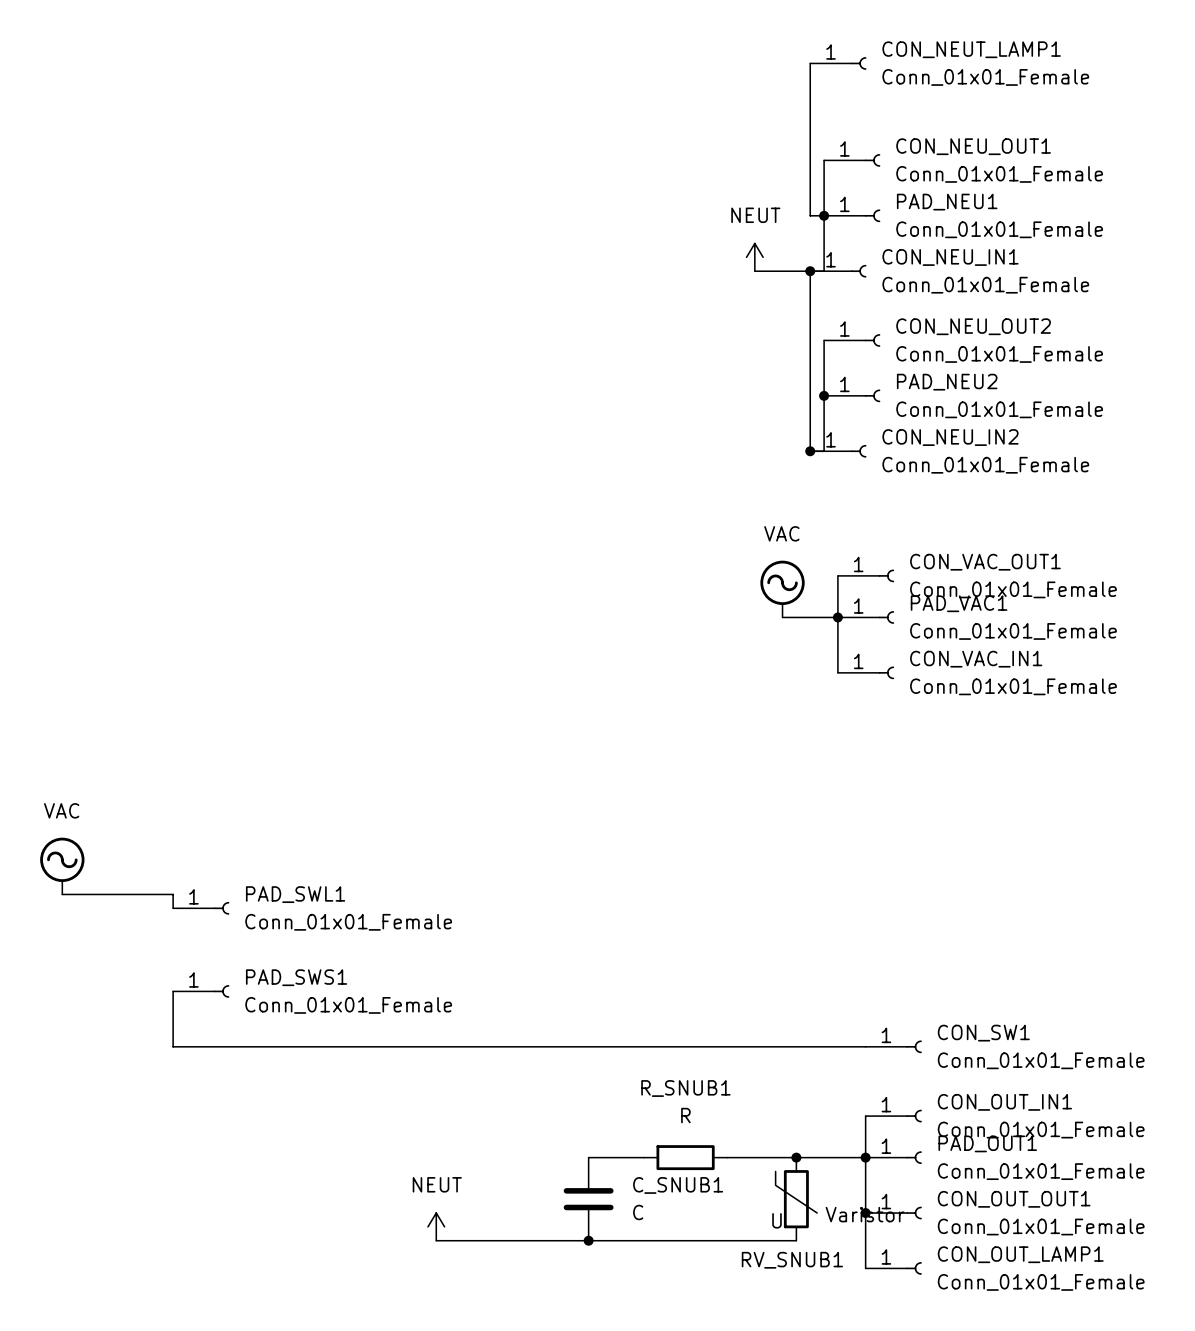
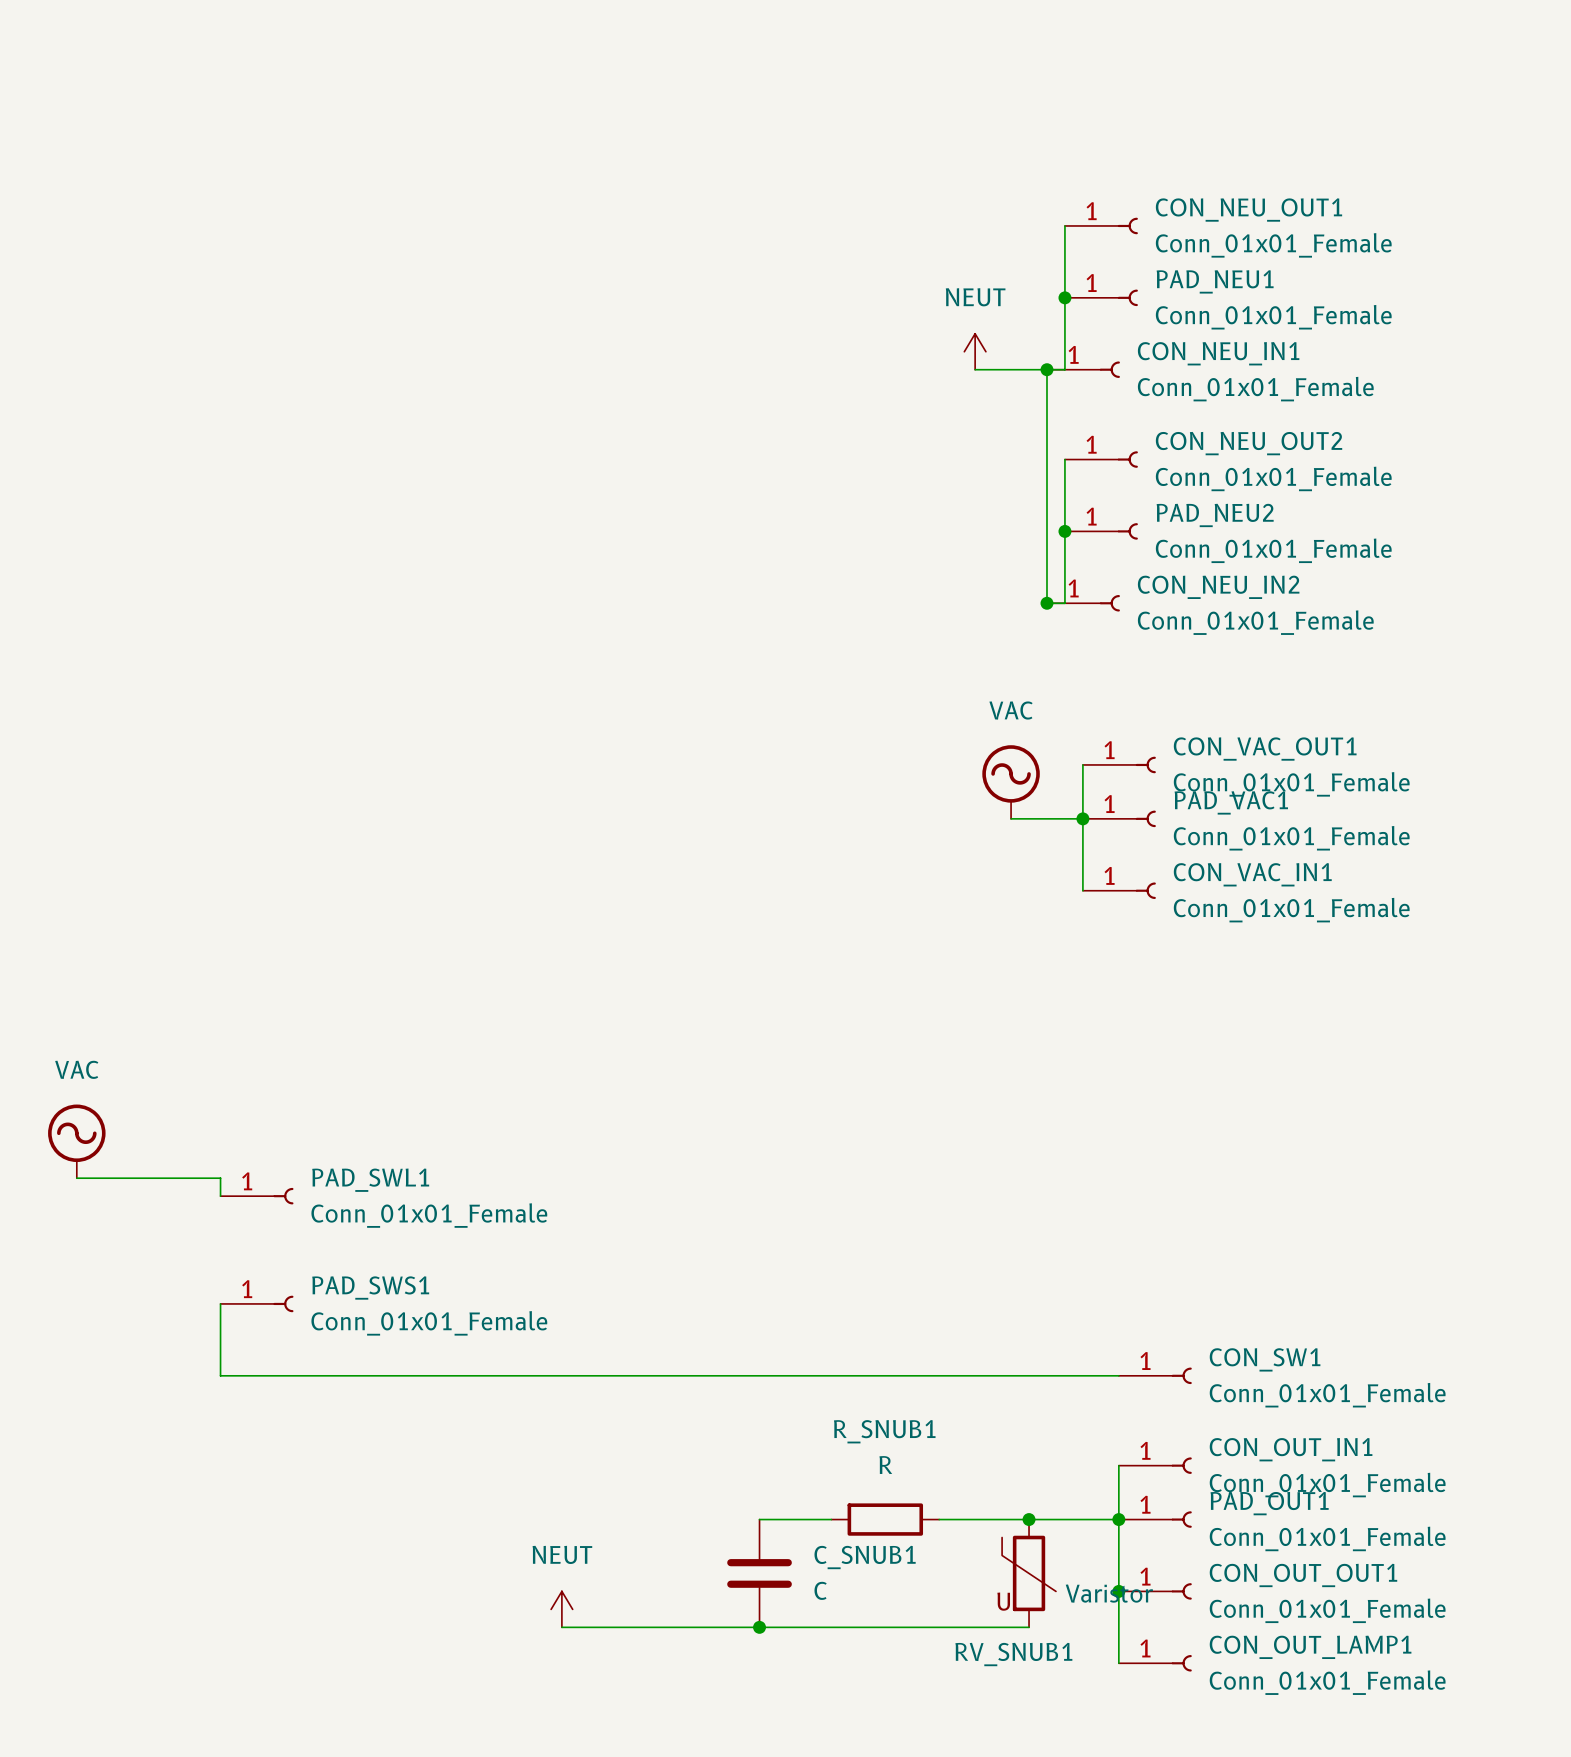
wire: (810, 63) (810, 215) (824, 215) -> none
CON_NEUT_LAMP1: Conn_01x01_Female (838, 63) -> none

